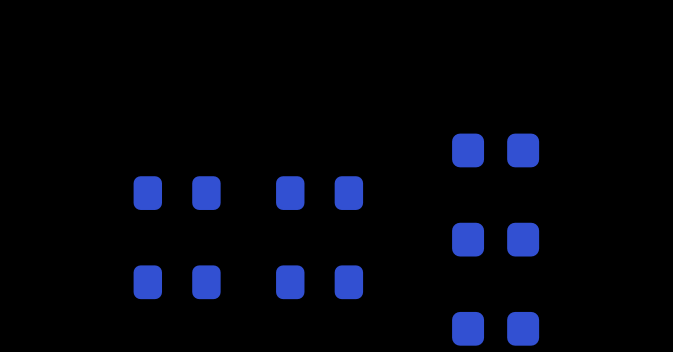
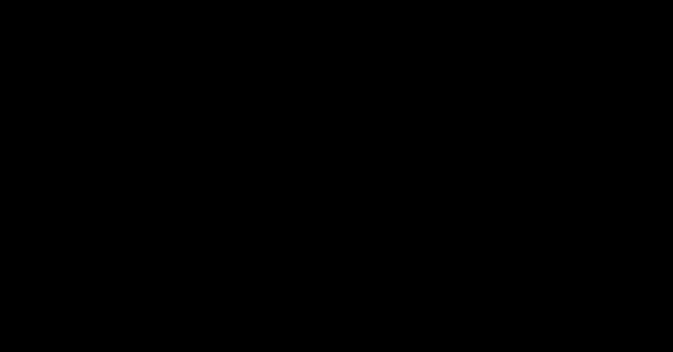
part: (495, 150) -> none
part: (177, 193) -> none
part: (319, 193) -> none
part: (495, 239) -> none
part: (177, 282) -> none
part: (319, 282) -> none
part: (495, 328) -> none

